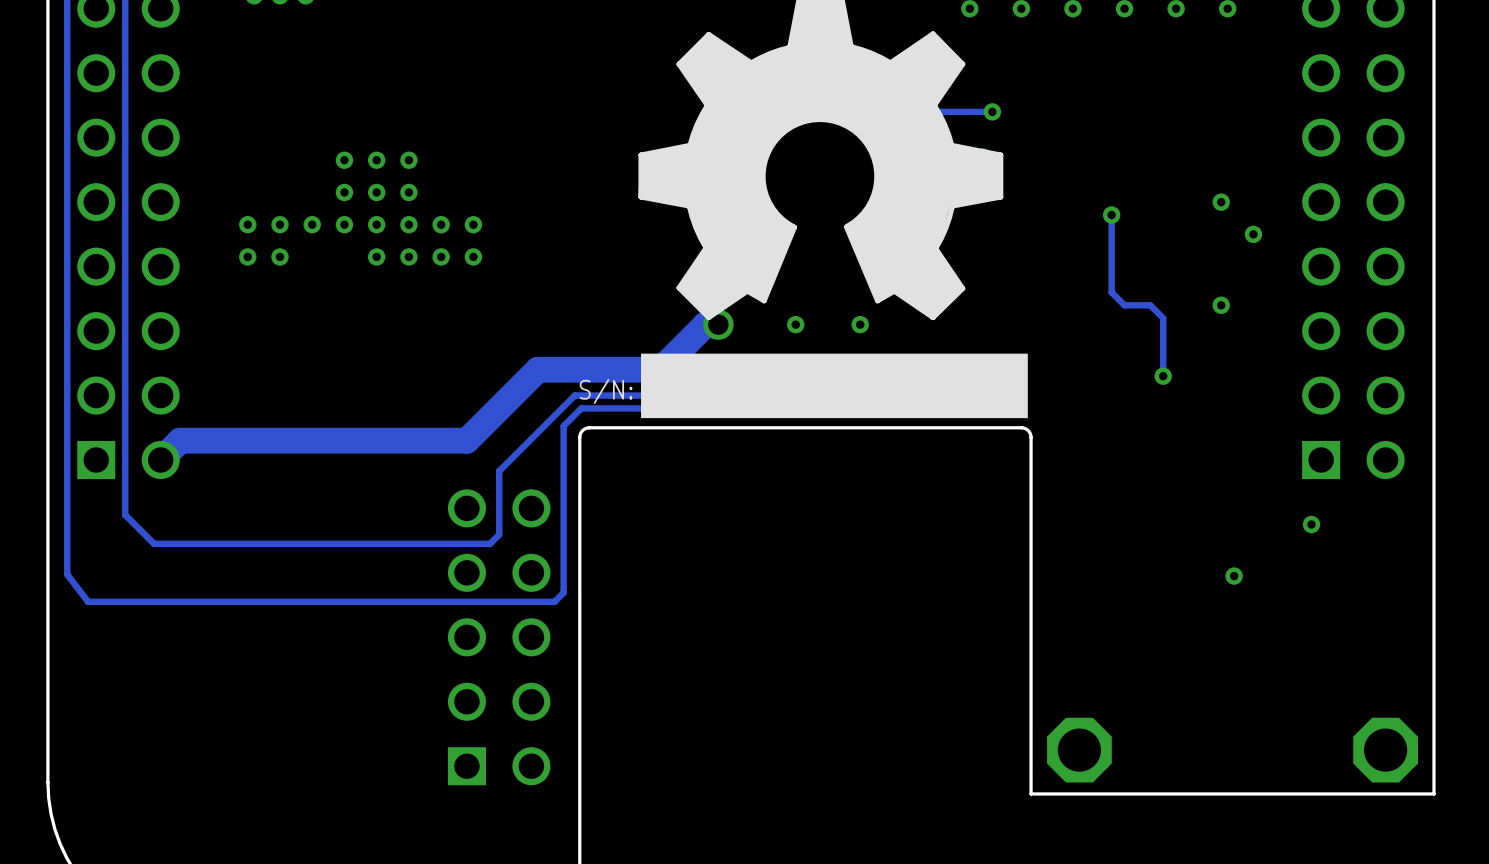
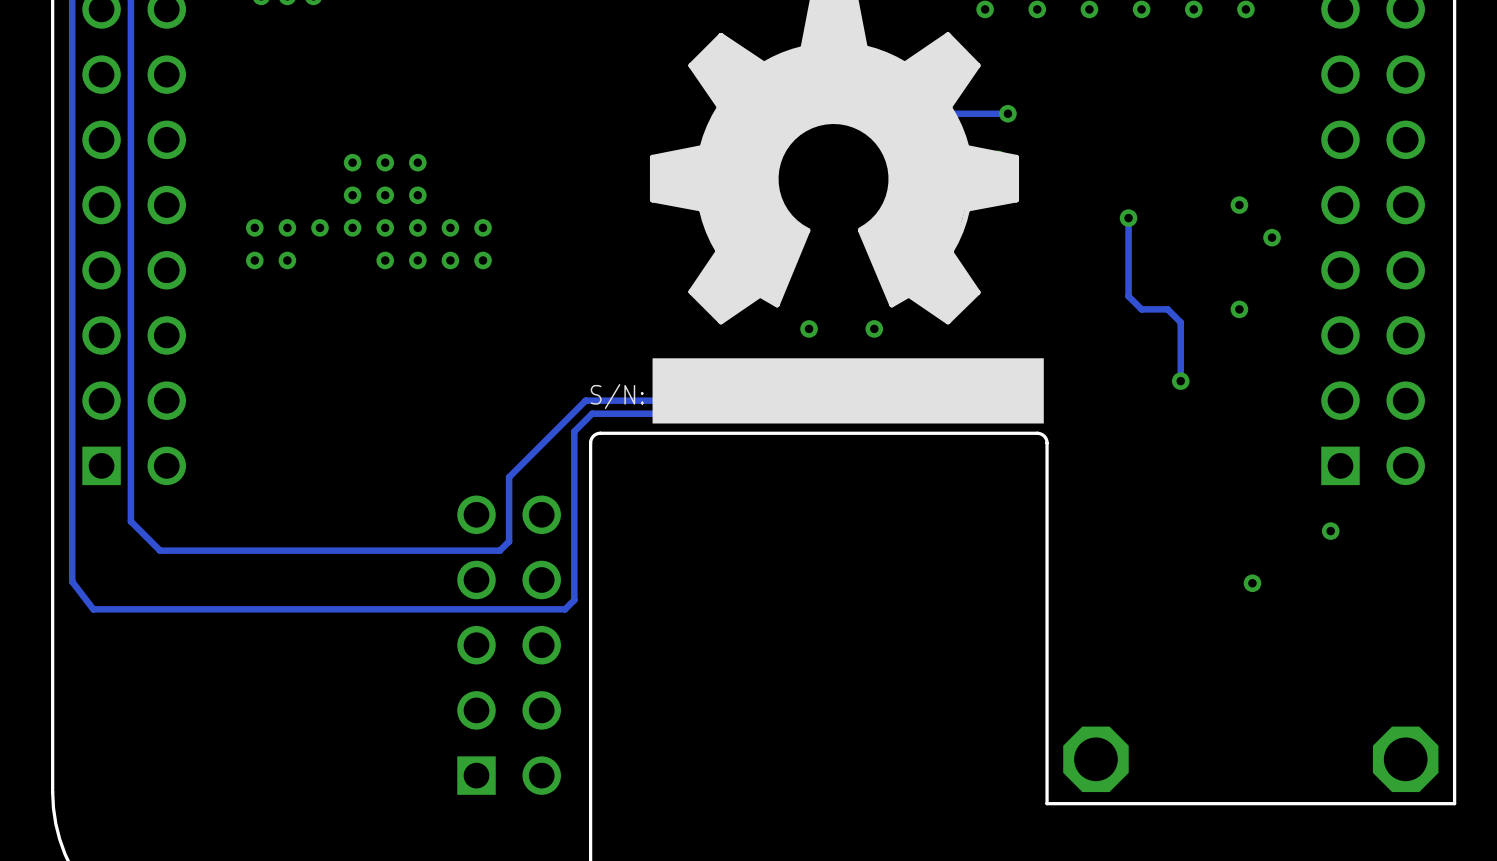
track: (718, 324) (705, 324) (660, 369) (537, 369) (466, 440) (180, 440) (160, 460) -> none
via: (718, 324) -> none

